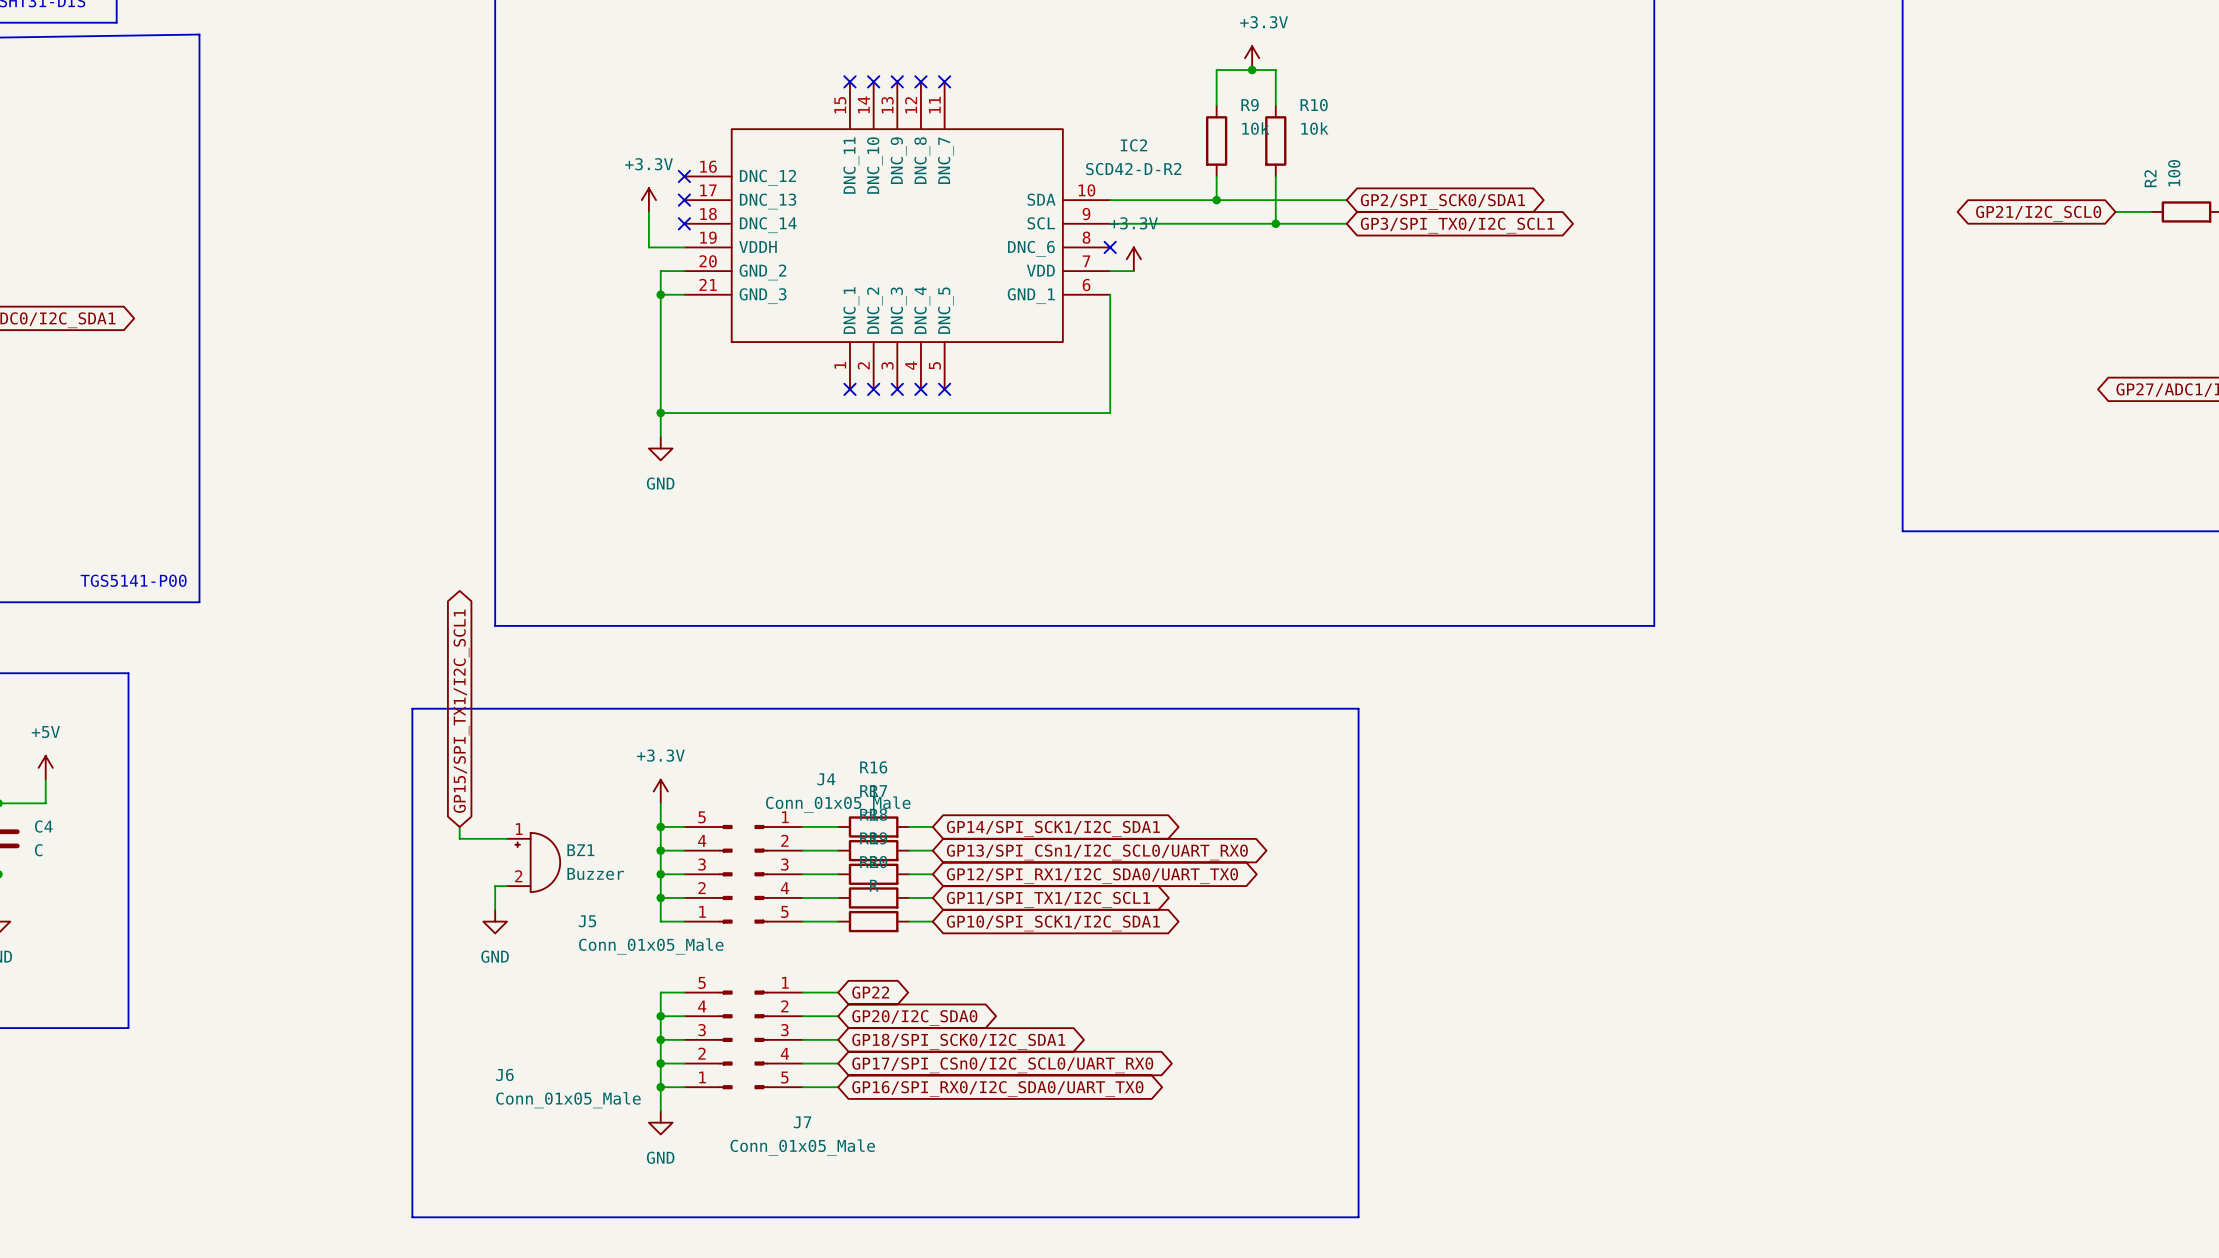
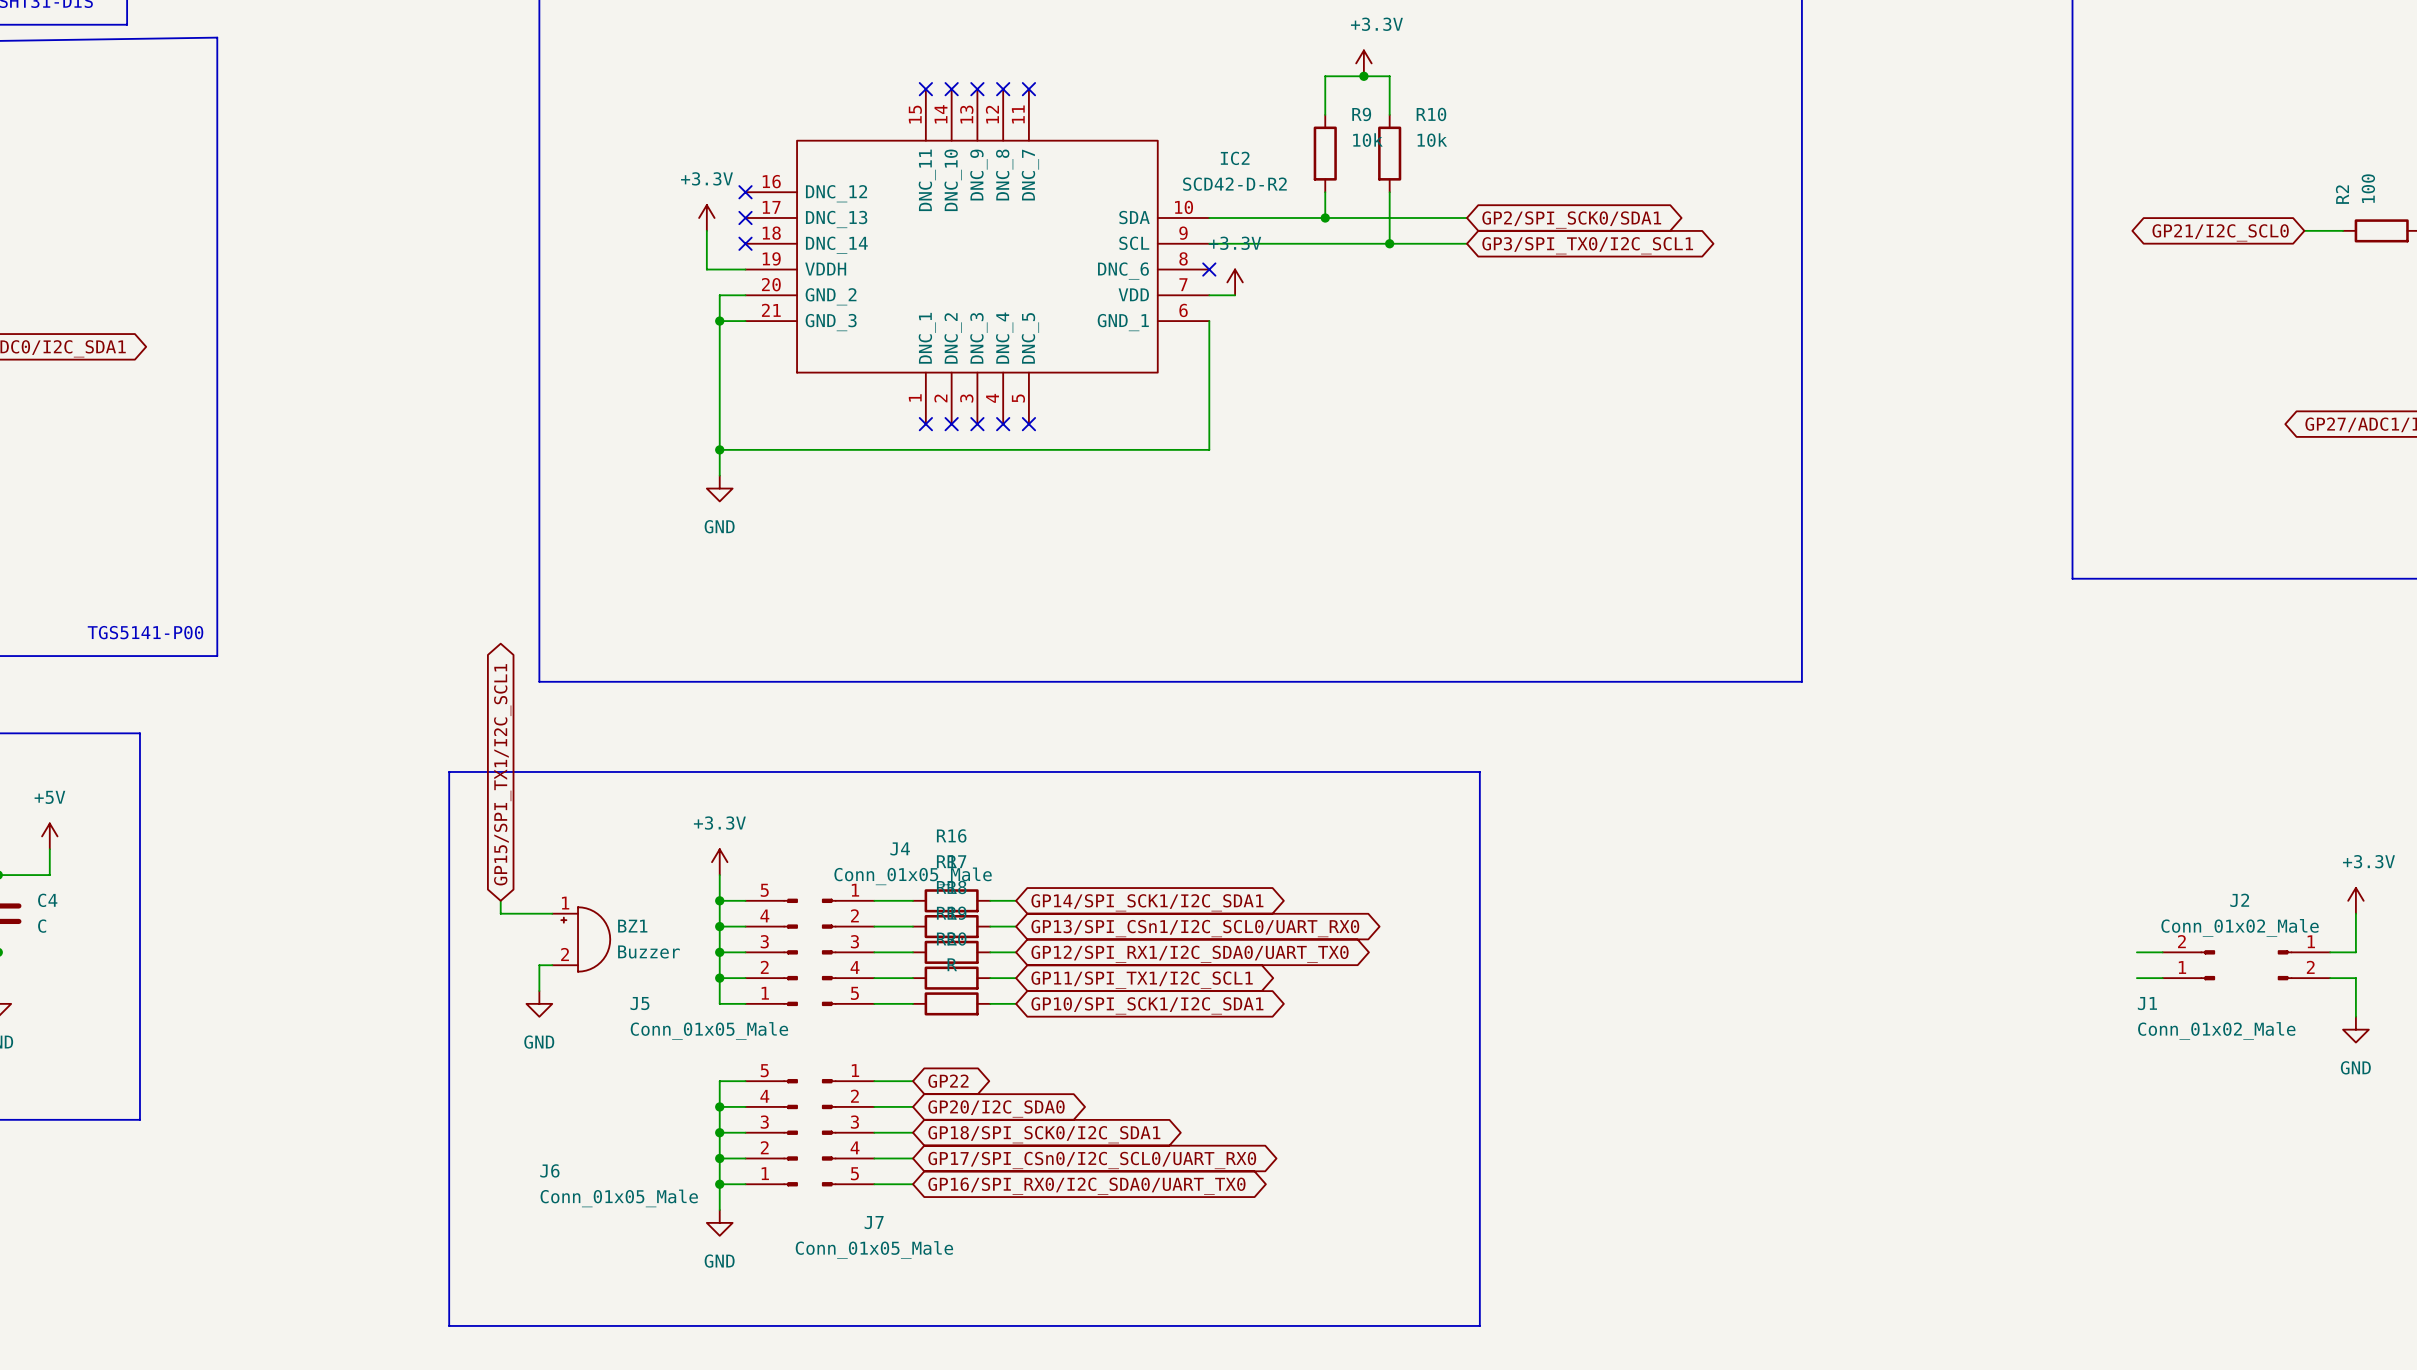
power symbol: none -> +3.3V (2355, 900)
wire: none -> (2355, 913) (2355, 952) (2330, 952)
wire: none -> (2136, 952) (2162, 952)
J1: none -> Conn_01x02_Male (2188, 965)
J2: none -> Conn_01x02_Male (2304, 965)
wire: none -> (2136, 978) (2162, 978)
wire: none -> (2330, 978) (2355, 978) (2355, 1016)
power symbol: none -> GND (2355, 1029)

